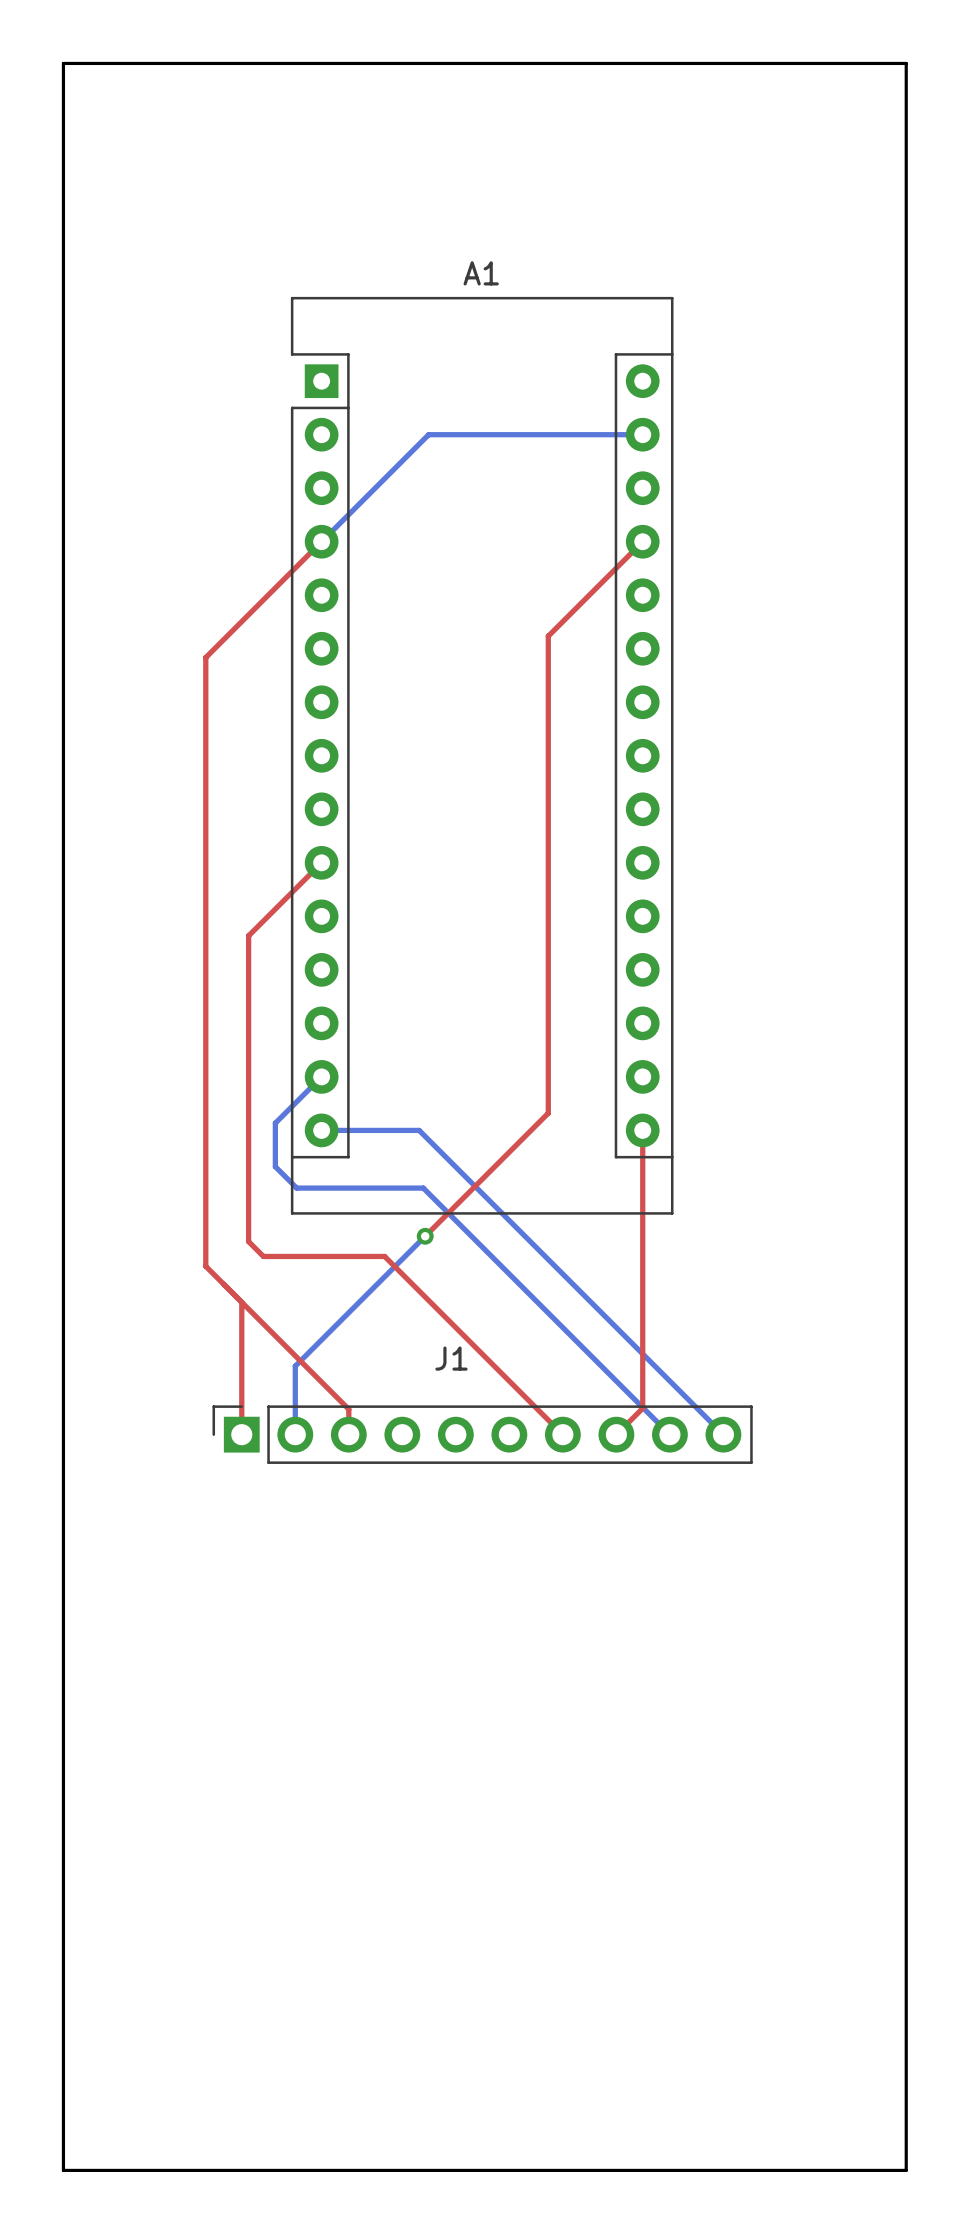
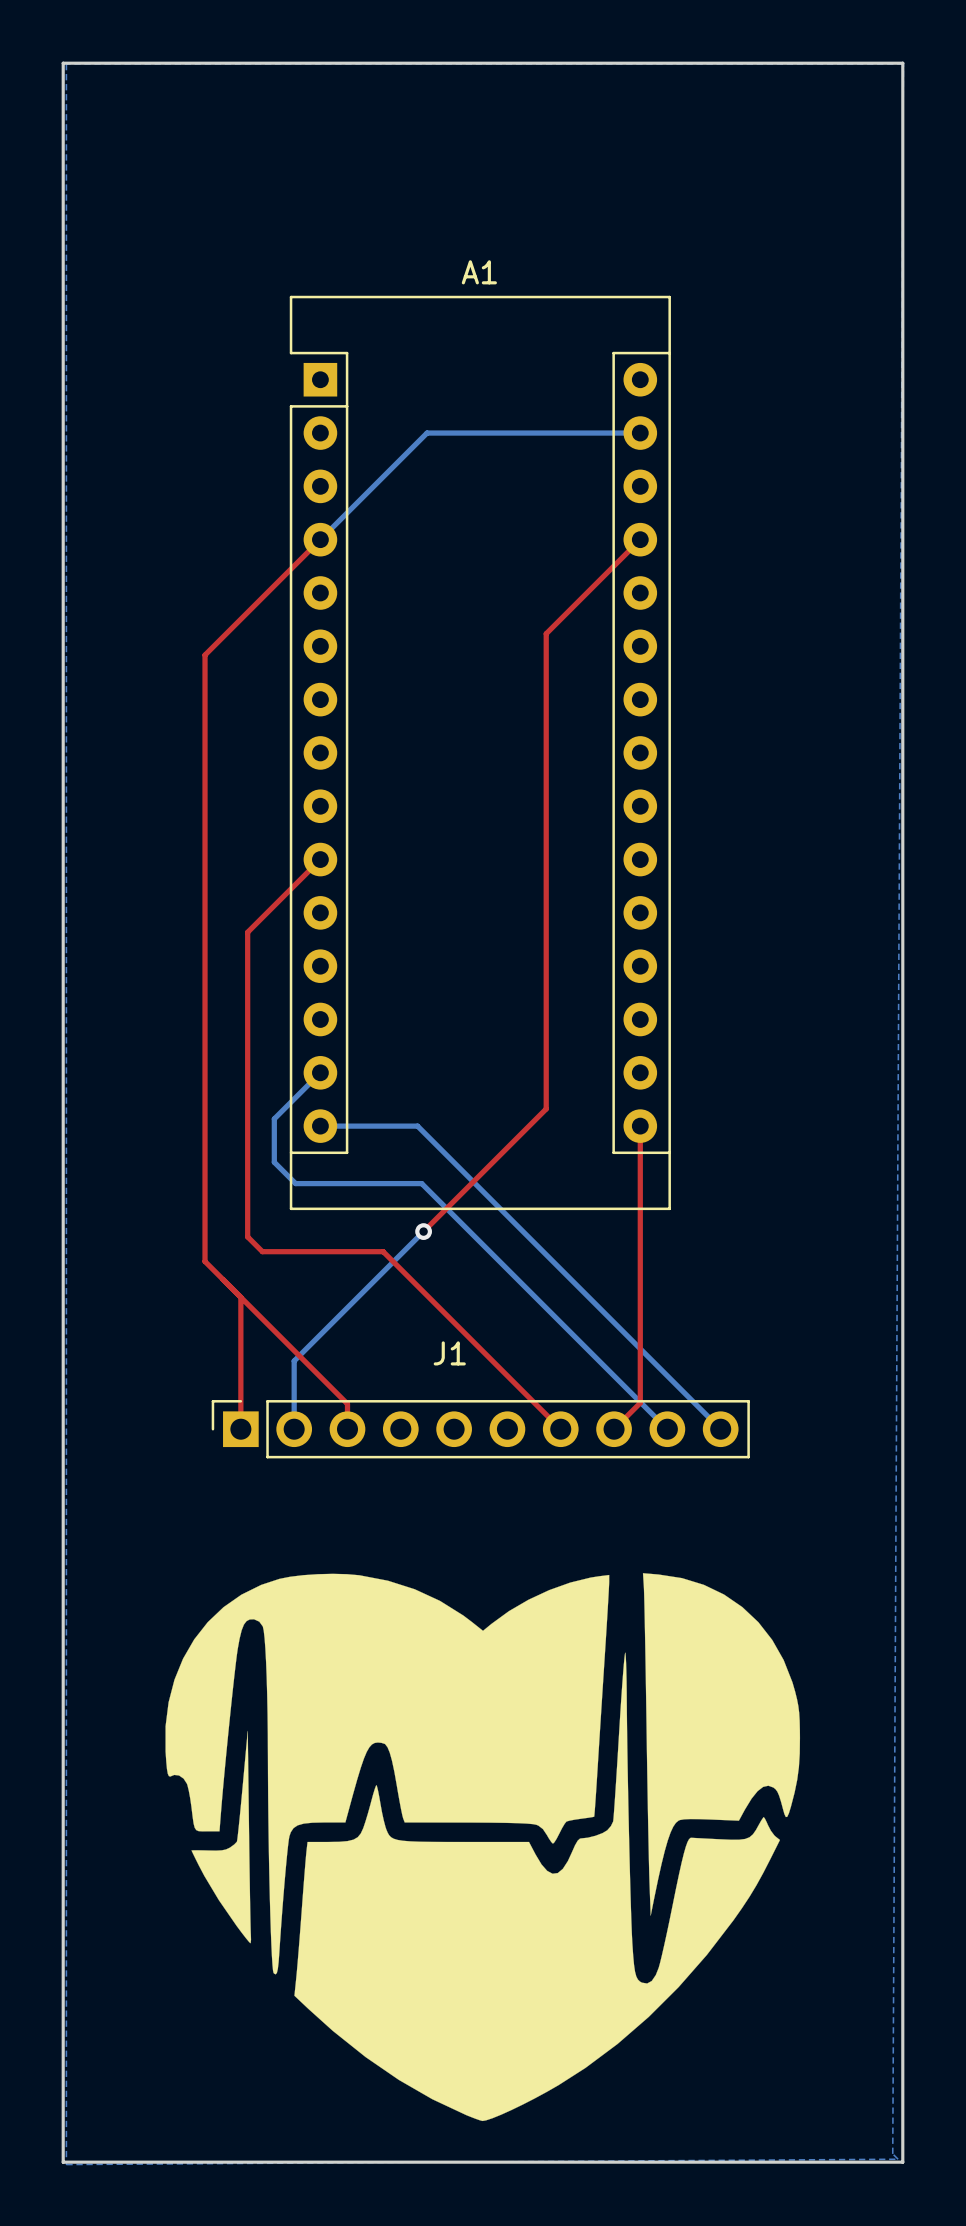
bottom zone outline: none -> (66, 64) (903, 64) (892, 2153) (898, 2159) (66, 2164) (66, 64)
drawing: none -> [165, 1573, 801, 2122]

